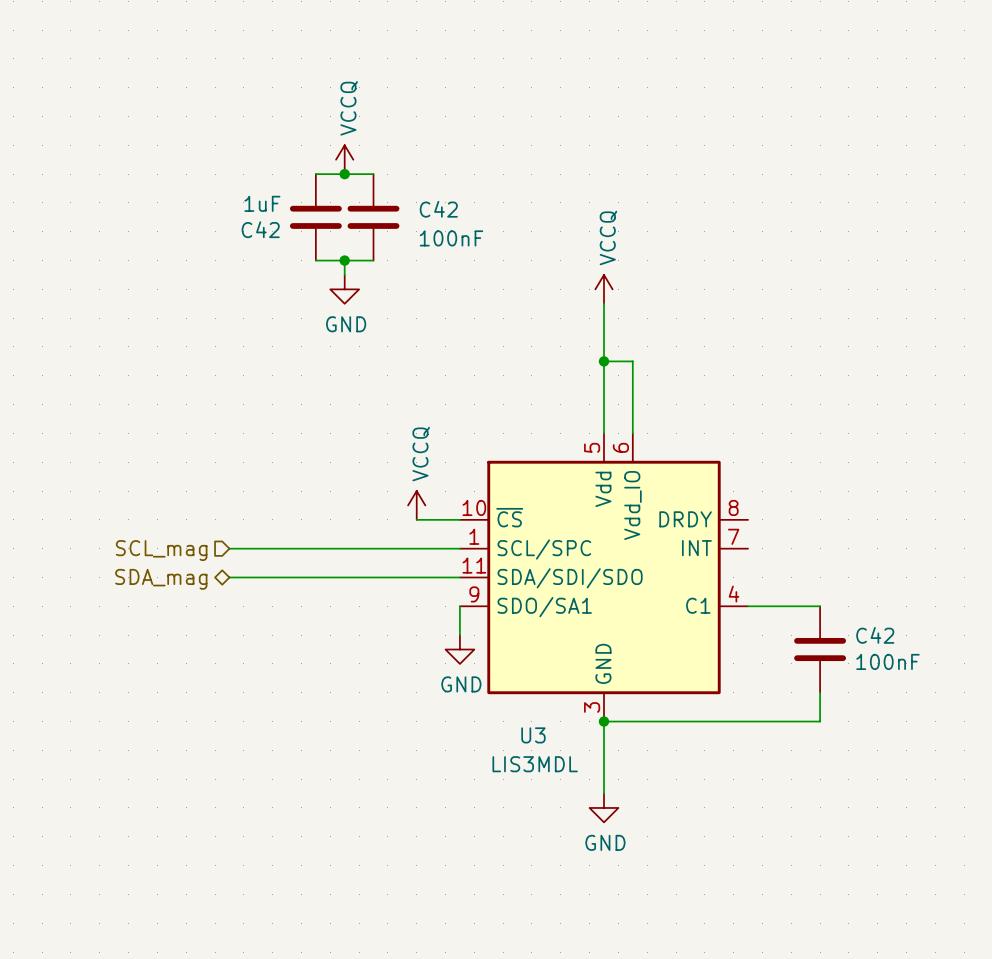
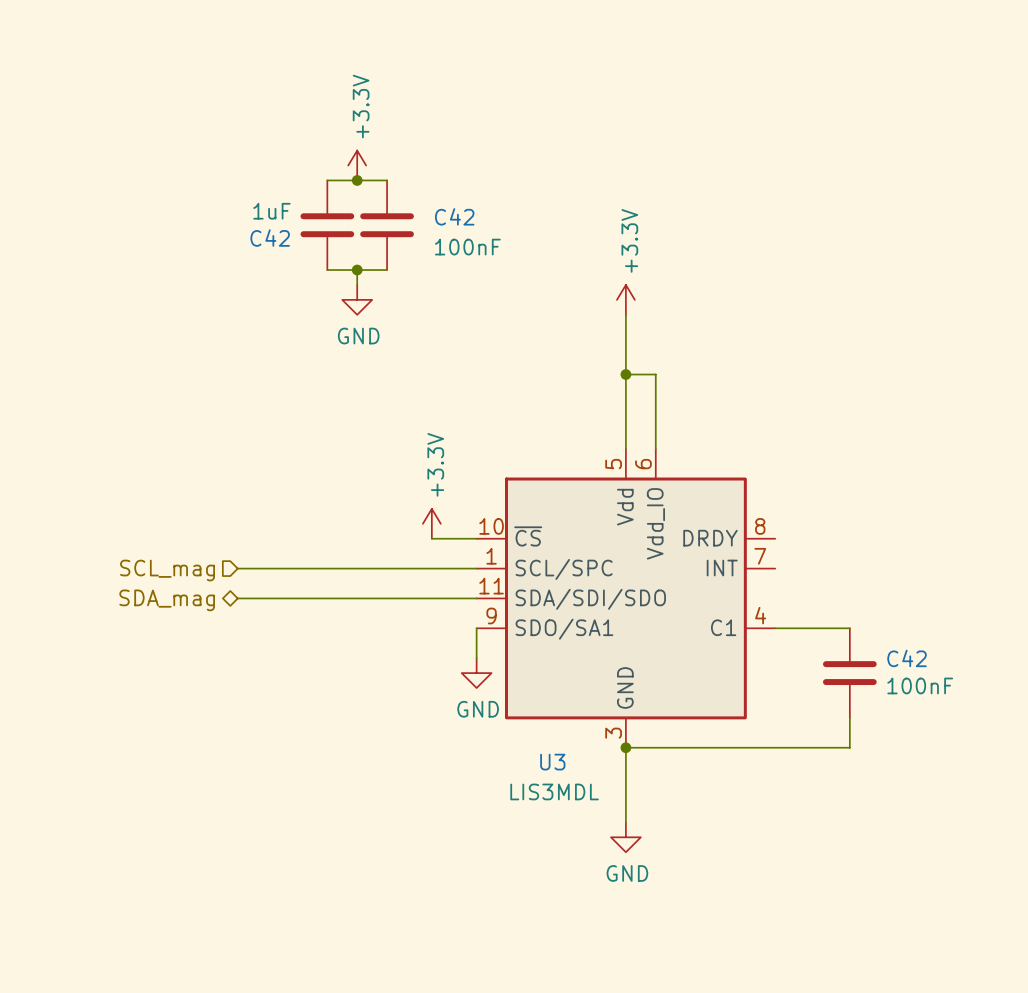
power symbol: VCCQ (344, 159) -> +3.3V (357, 165)
power symbol: VCCQ (603, 289) -> +3.3V (625, 299)
power symbol: VCCQ (416, 505) -> +3.3V (431, 523)

